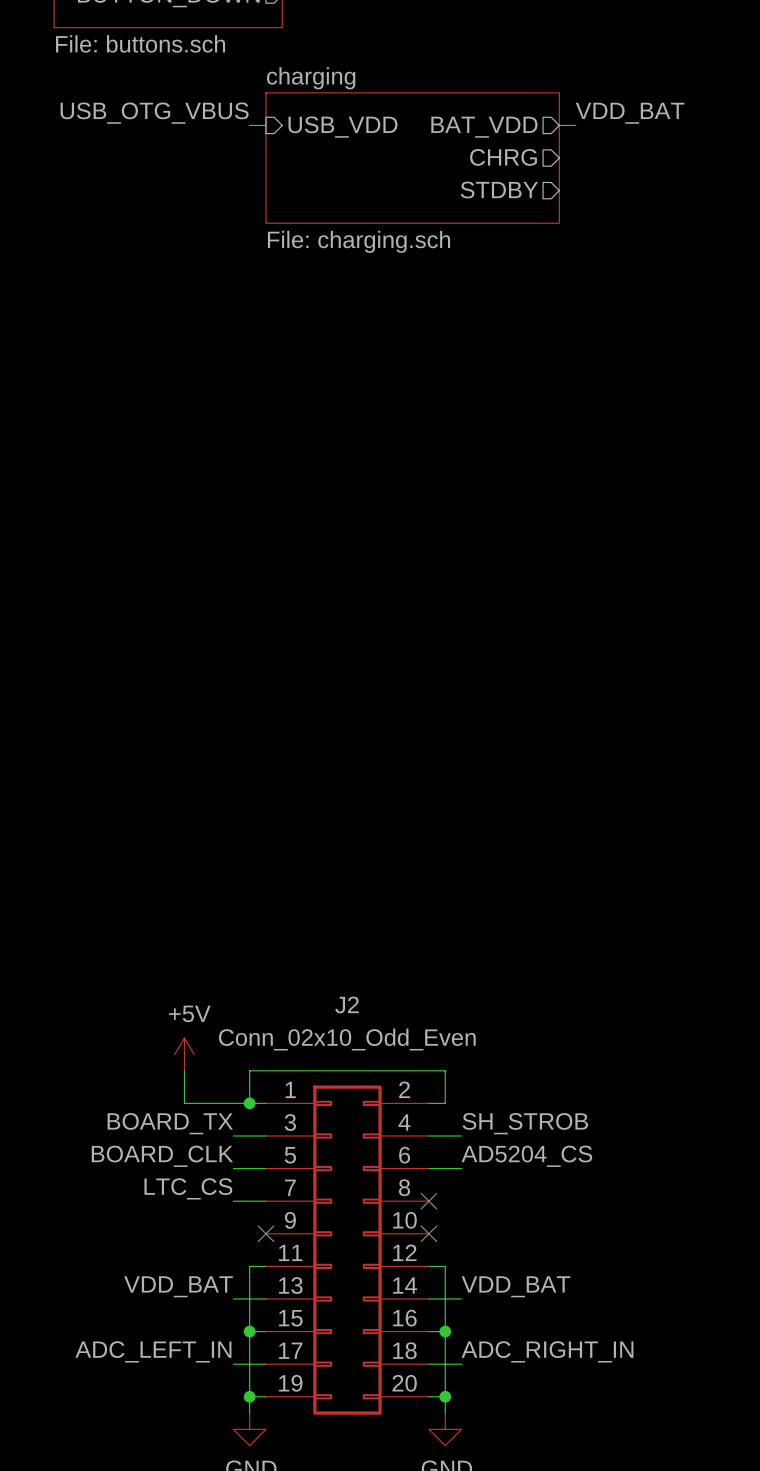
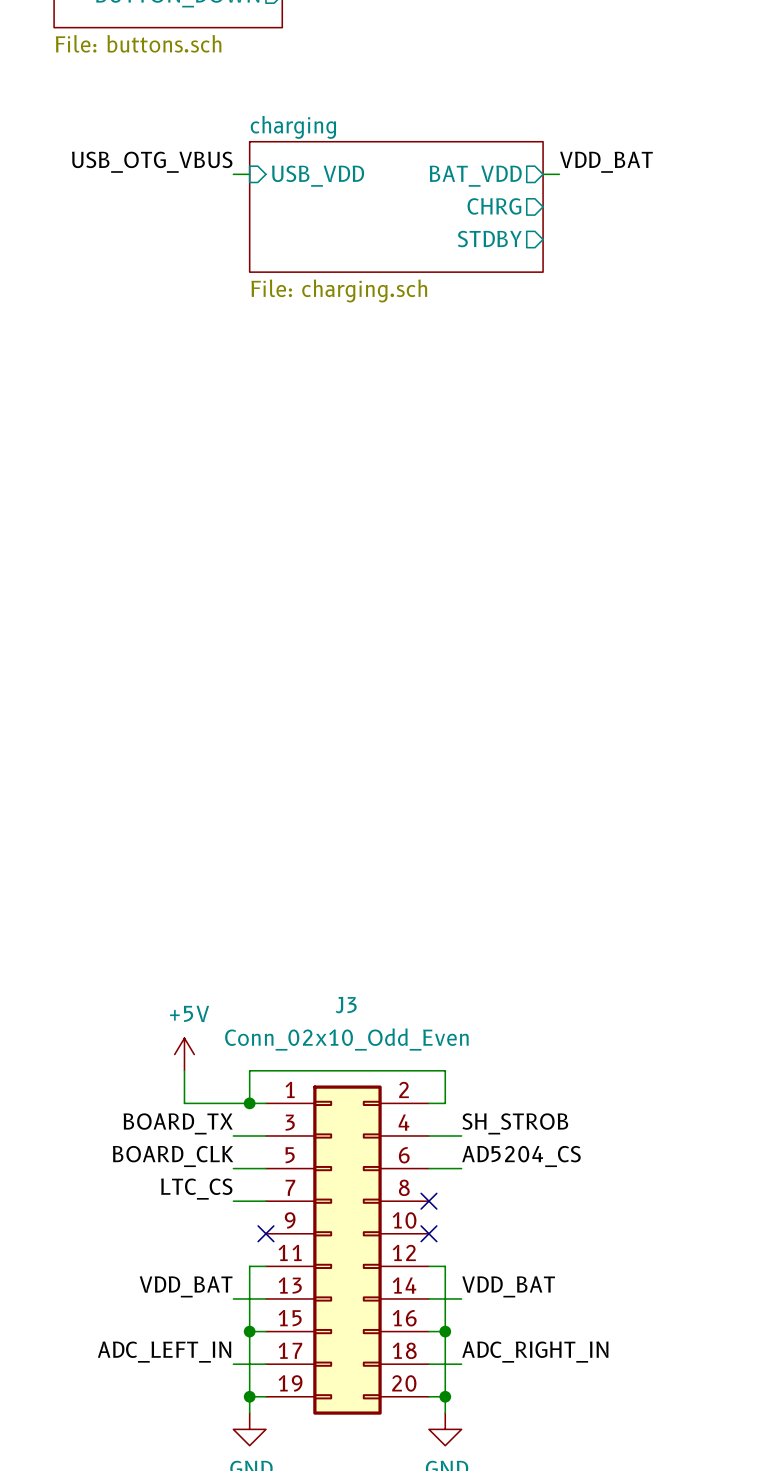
label position: USB_OTG_VBUS (154, 113) -> USB_OTG_VBUS (152, 162)
label position: VDD_BAT (630, 113) -> VDD_BAT (606, 162)
wire: (249, 125) (265, 125) -> (233, 174) (249, 174)
wire: (559, 125) (575, 125) -> (543, 174) (559, 174)
sheet pin position: USB_VDD (342, 127) -> USB_VDD (318, 176)
sheet pin position: BAT_VDD (484, 127) -> BAT_VDD (475, 176)
sheet pin position: CHRG (503, 157) -> CHRG (494, 206)
sheet charging position: (412, 158) -> (396, 206)
sheet pin position: STDBY (499, 190) -> STDBY (489, 239)
J2 name: J2 (347, 1004) -> J3 (346, 1005)

